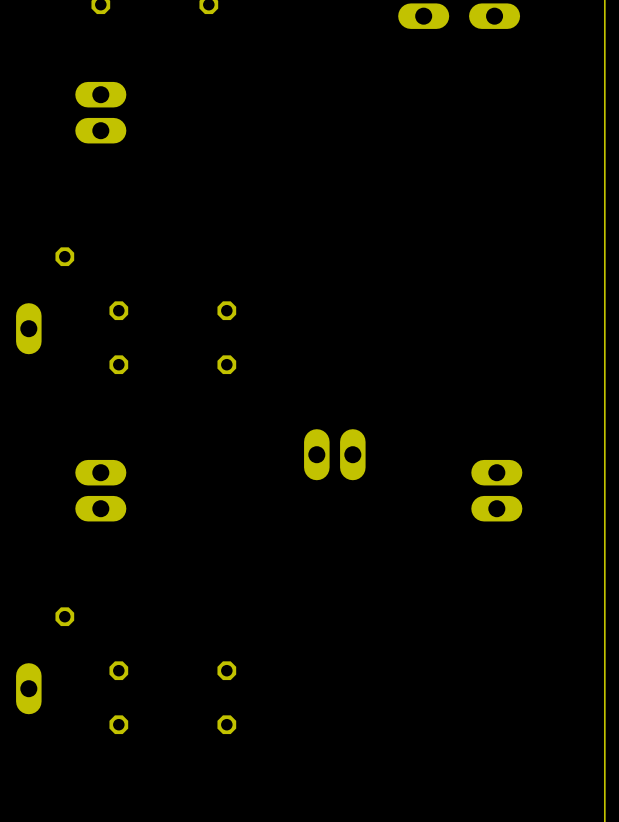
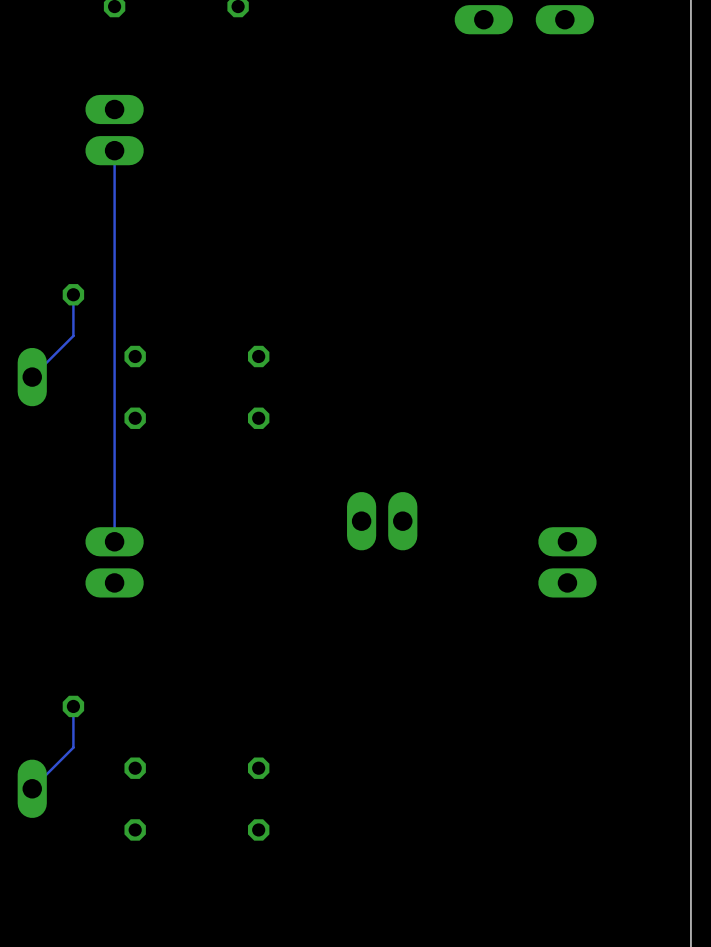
track: none -> (114, 150) (114, 541)
track: none -> (73, 294) (73, 335) (32, 377)
track: none -> (73, 706) (73, 747) (32, 788)

